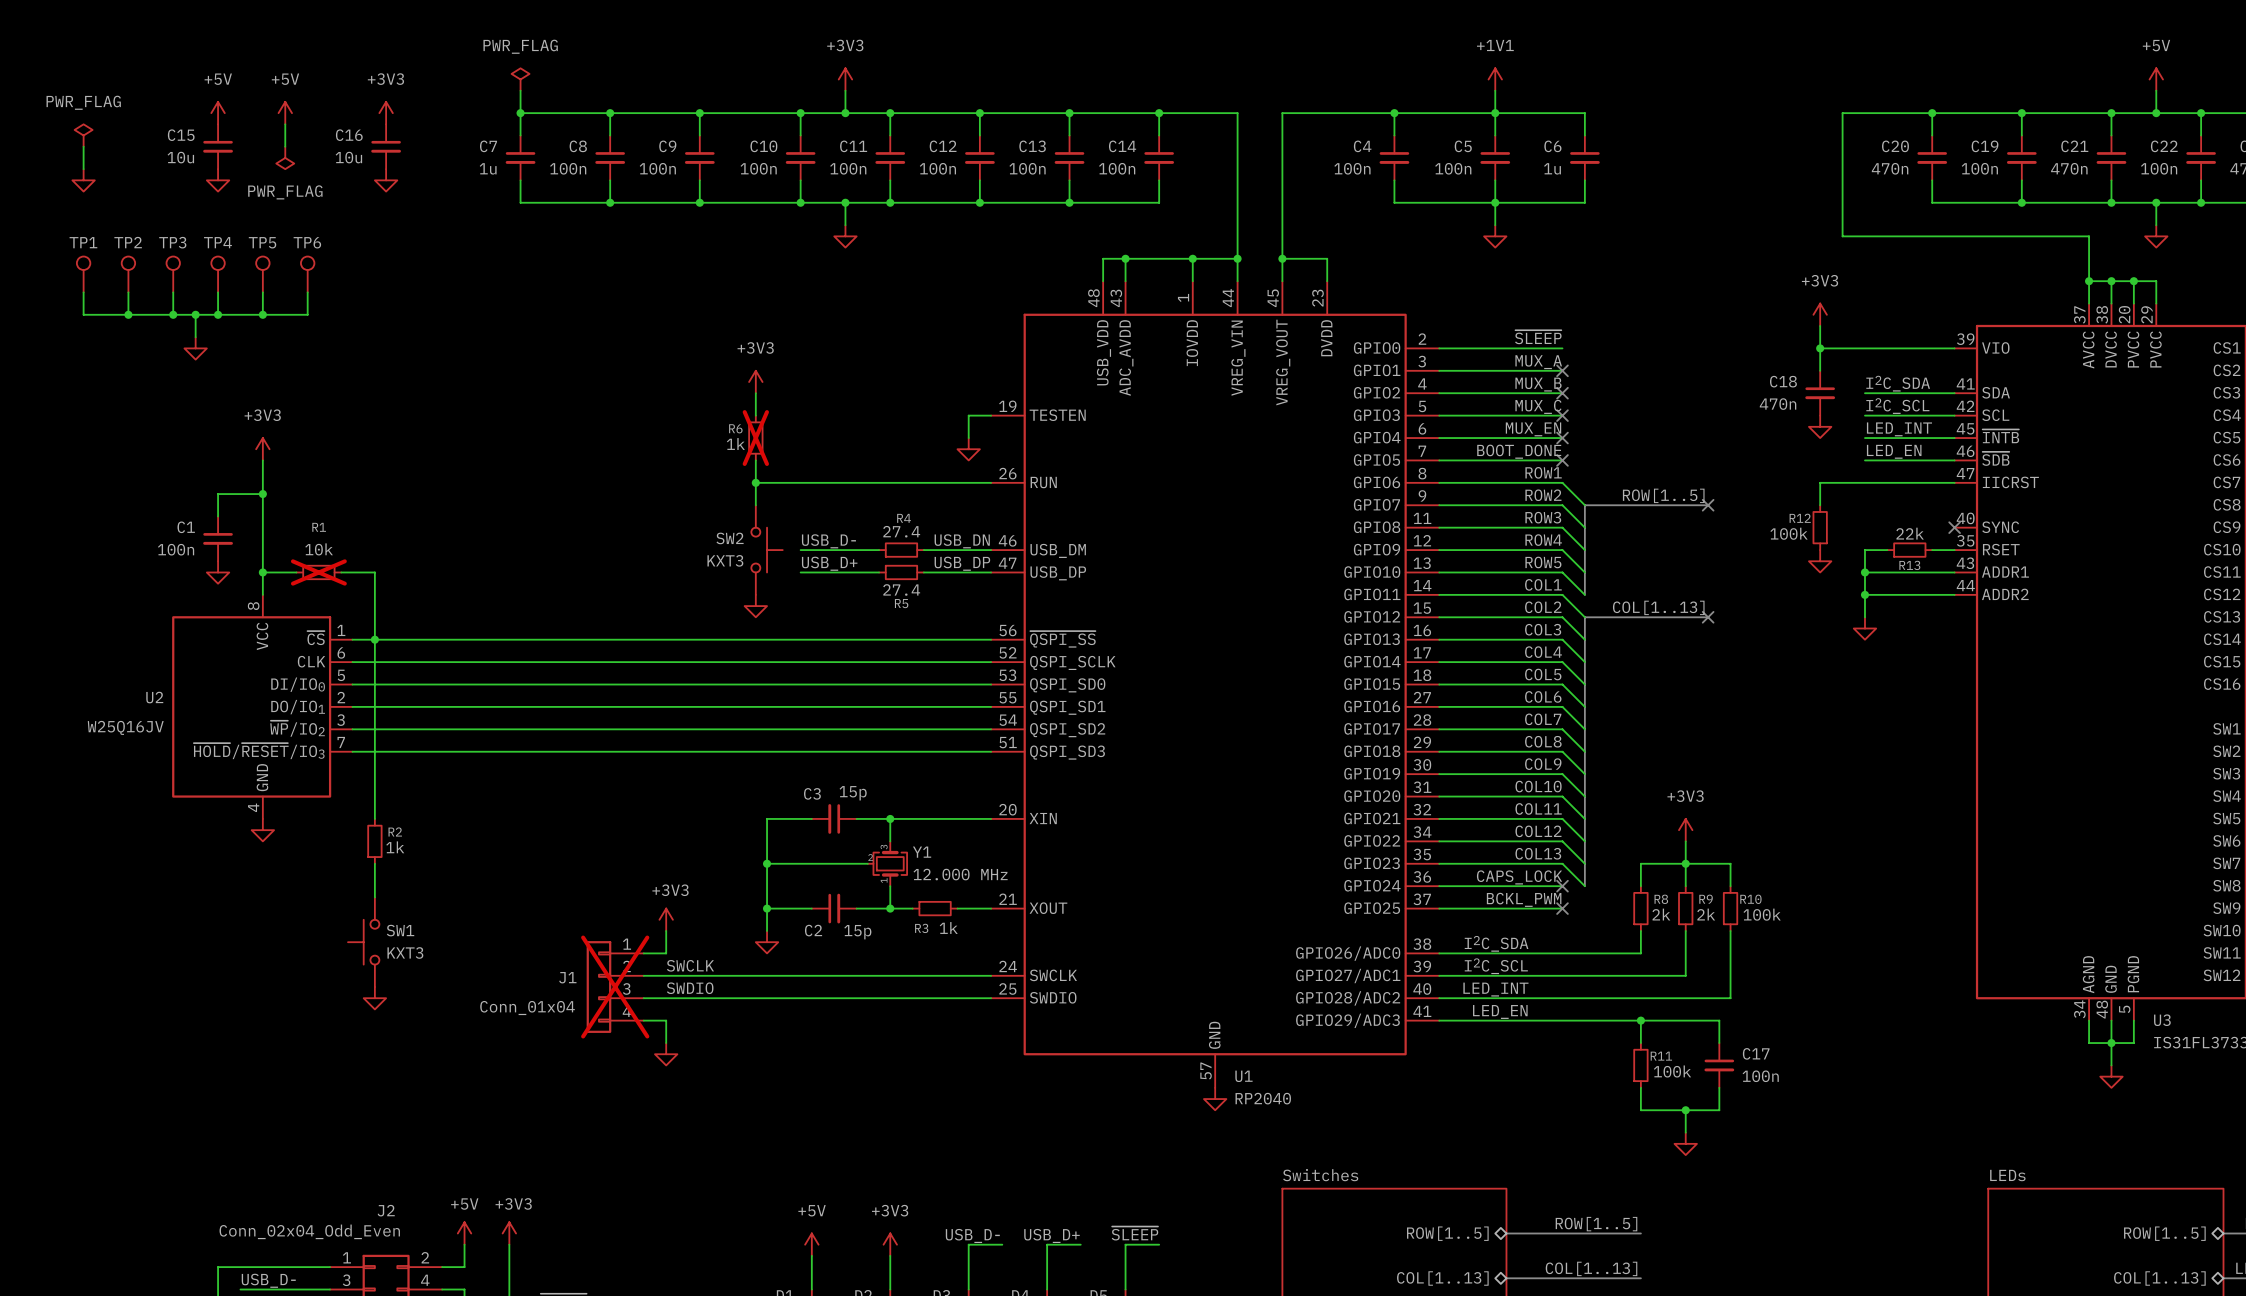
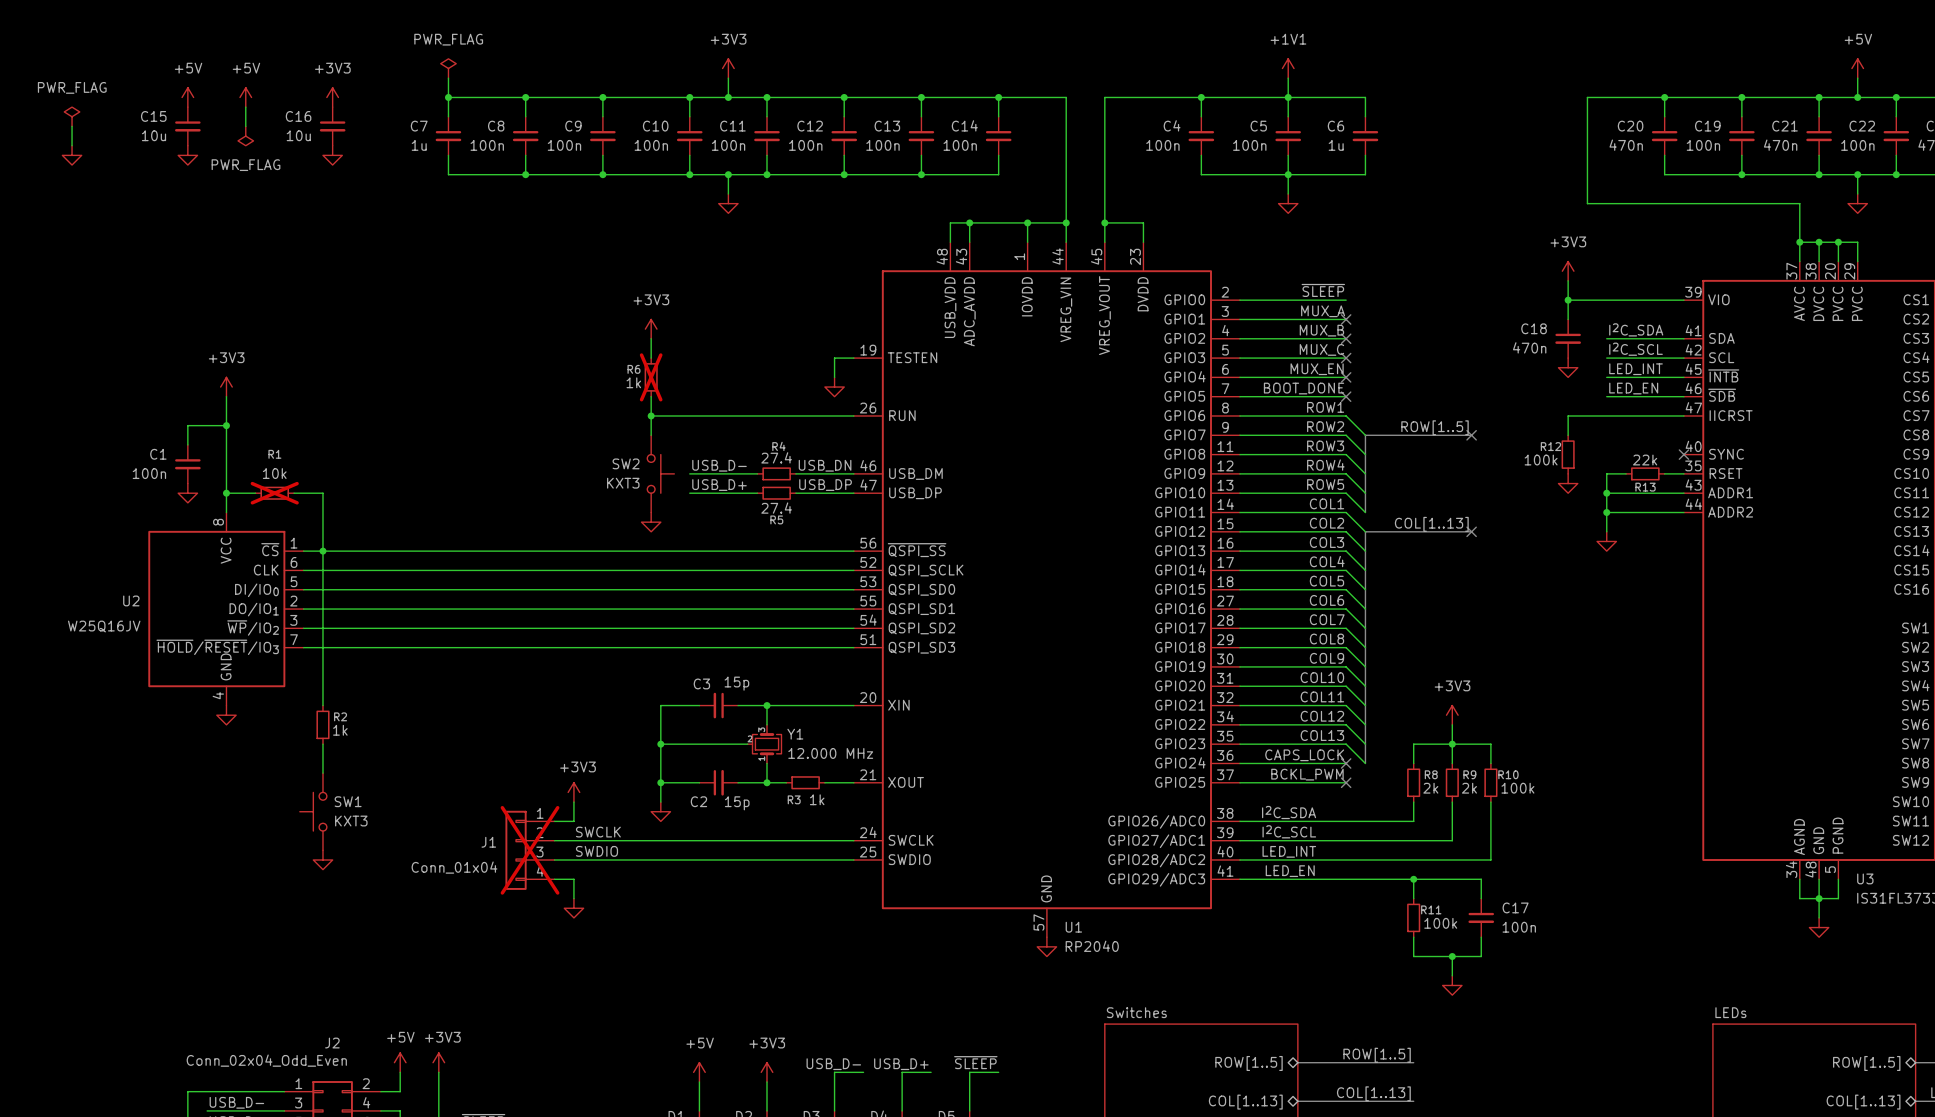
TP1: (83, 274) -> none
TP2: (128, 274) -> none
TP3: (173, 274) -> none
TP4: (218, 274) -> none
TP5: (262, 274) -> none
TP6: (307, 274) -> none
wire: (83, 292) (83, 314) (307, 314) (307, 292) -> none
wire: (128, 292) (128, 314) -> none
wire: (173, 292) (173, 314) -> none
wire: (218, 292) (218, 314) -> none
wire: (262, 292) (262, 314) -> none
junction: (128, 314) -> none
junction: (173, 314) -> none
wire: (195, 314) (195, 337) -> none
junction: (195, 314) -> none
junction: (218, 314) -> none
junction: (262, 314) -> none
power symbol: (195, 348) -> none

